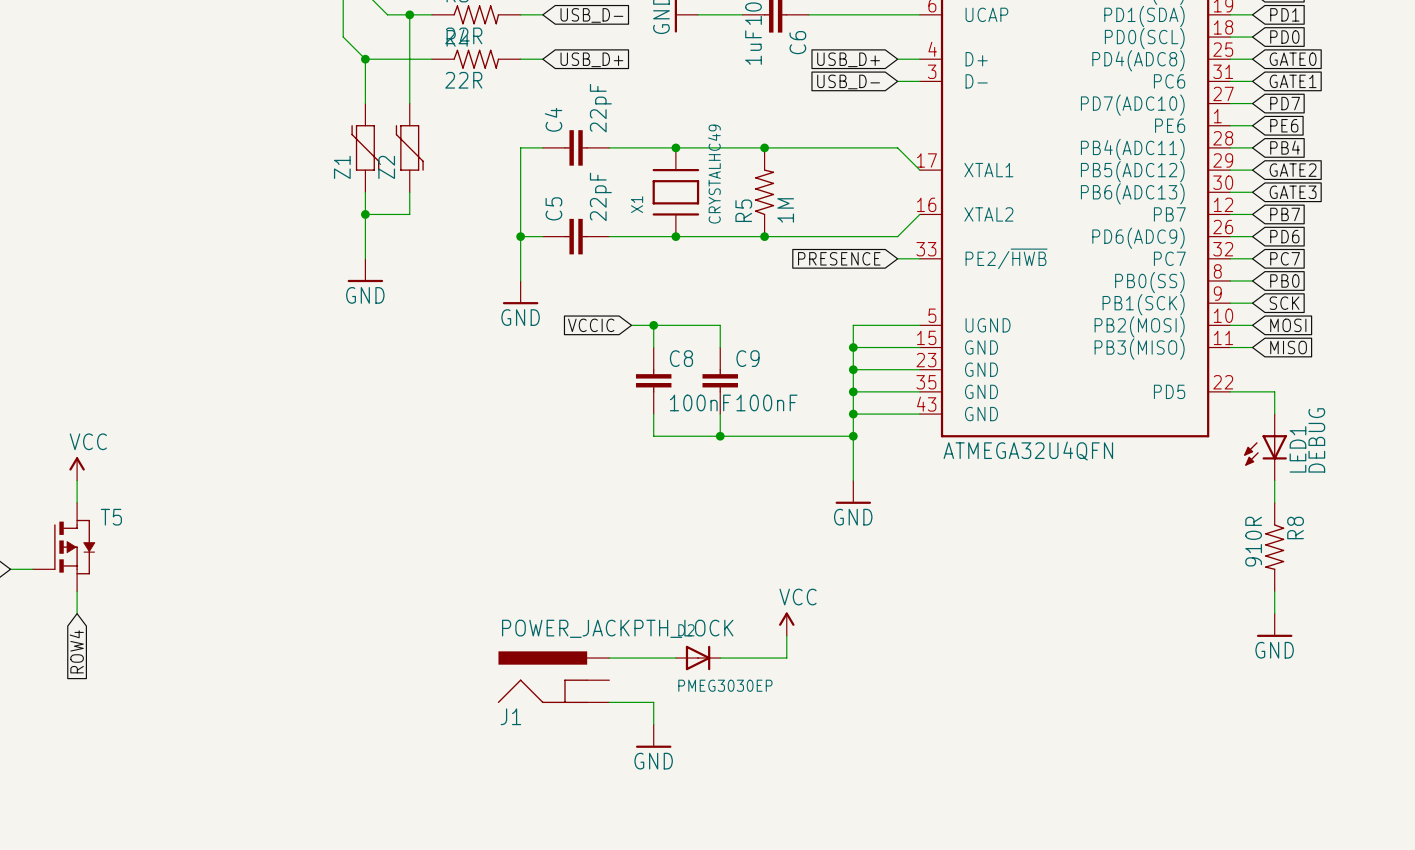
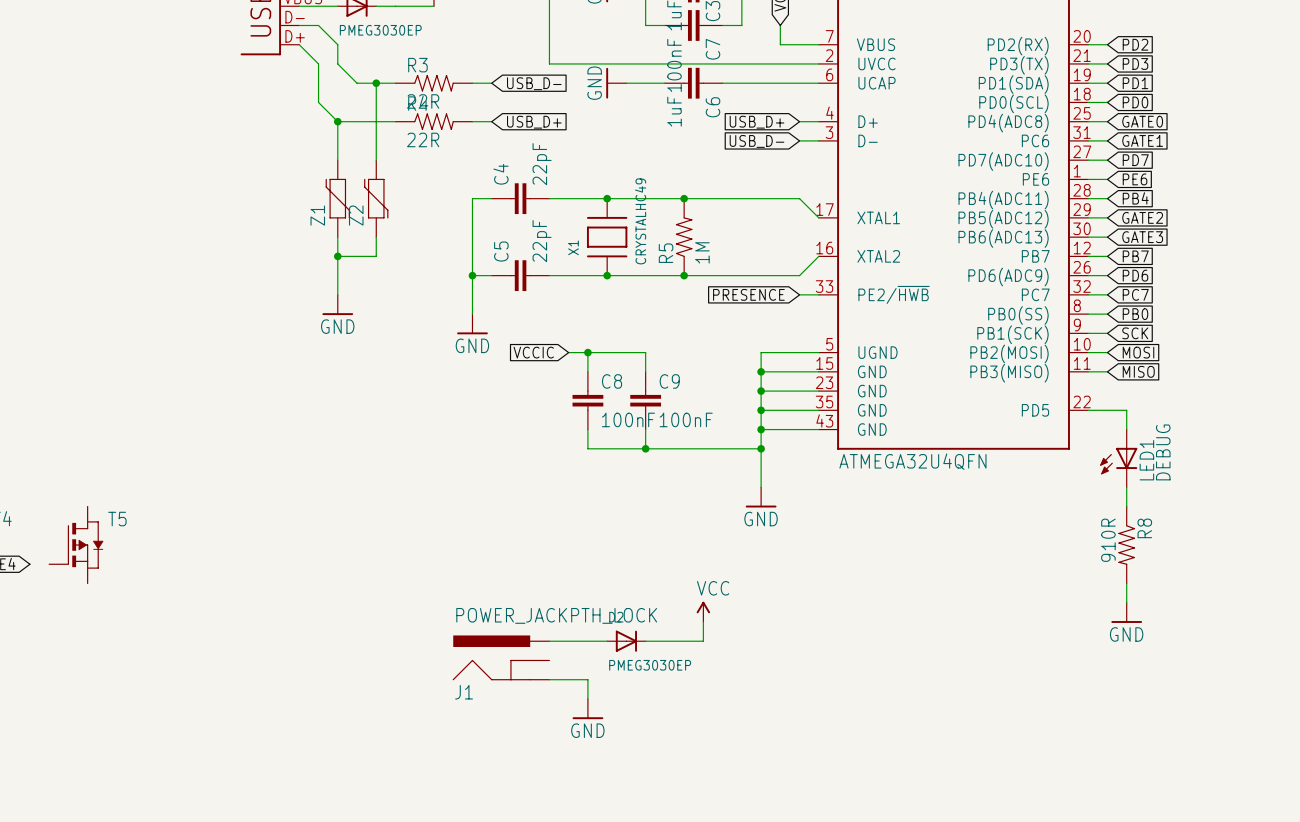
power symbol: VCC (77, 468) -> none
wire: (77, 480) (77, 502) -> none
wire: (10, 569) (32, 569) -> none
wire: (77, 591) (77, 613) -> none
global label: ROW4 (76, 651) -> none

